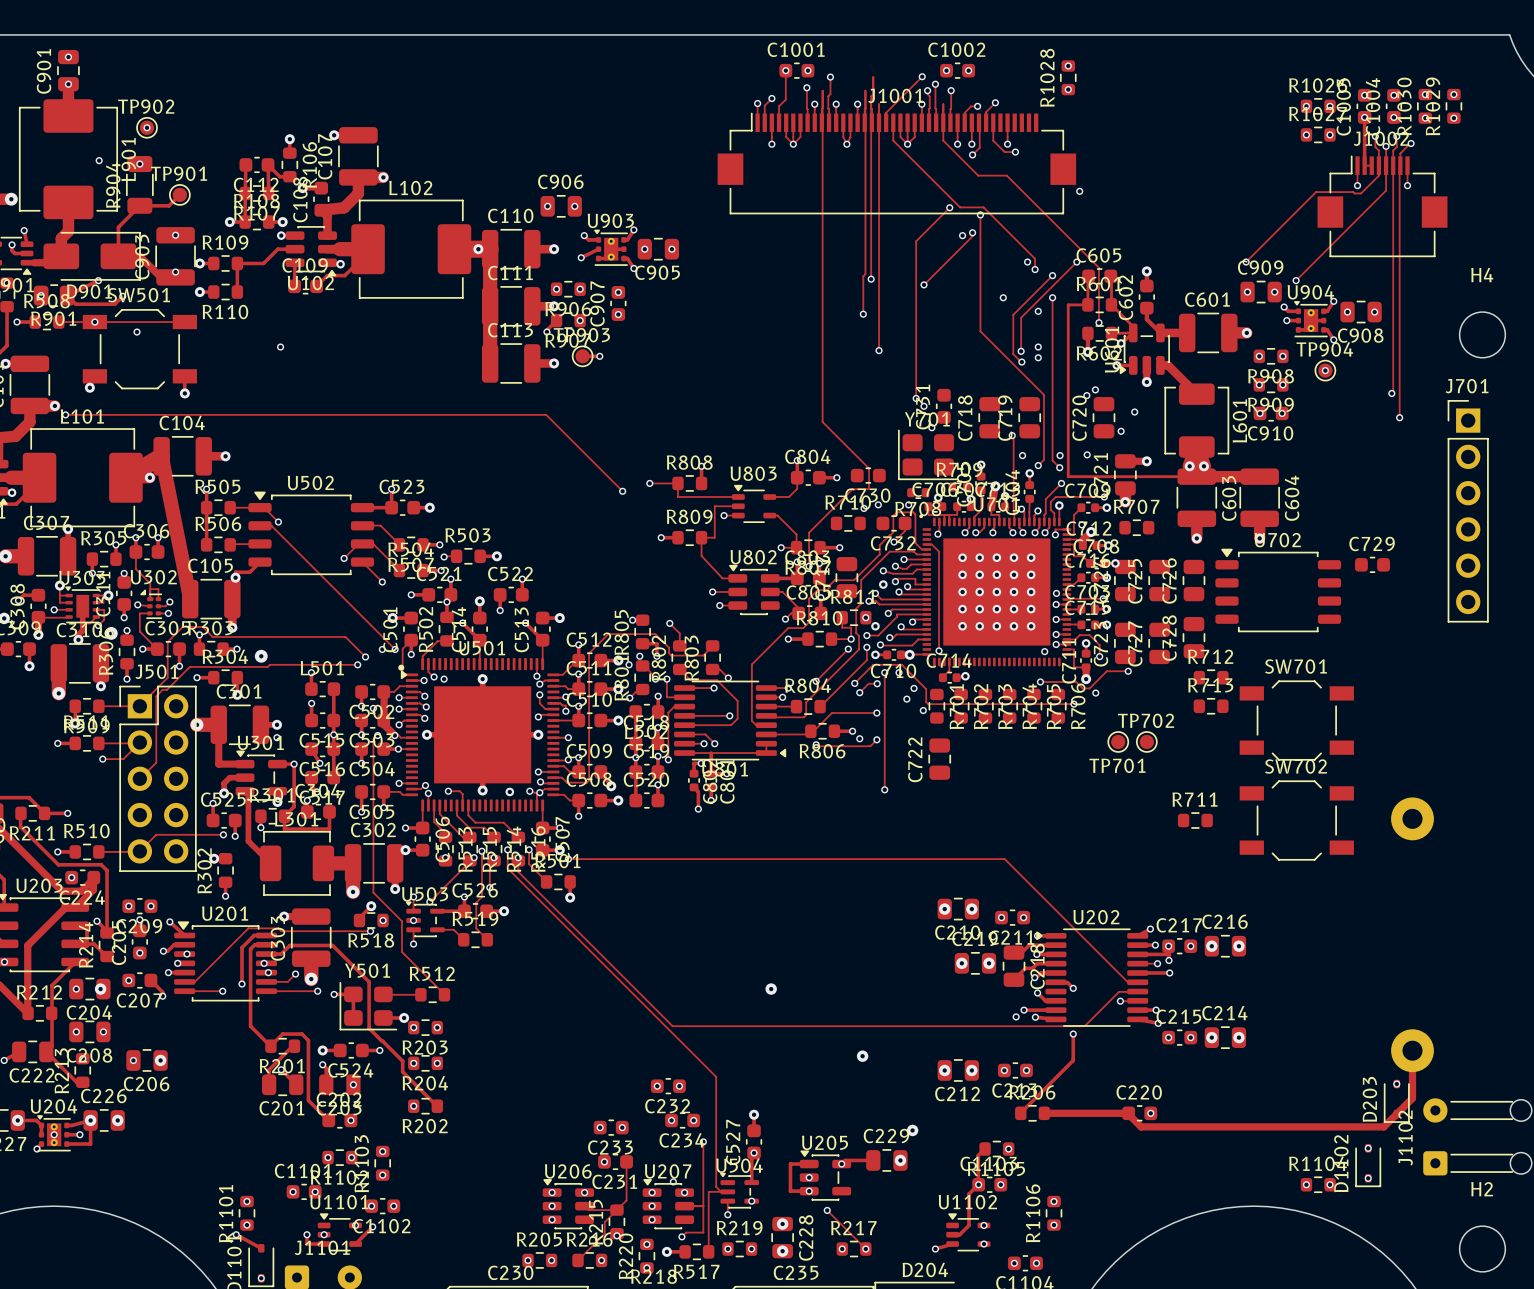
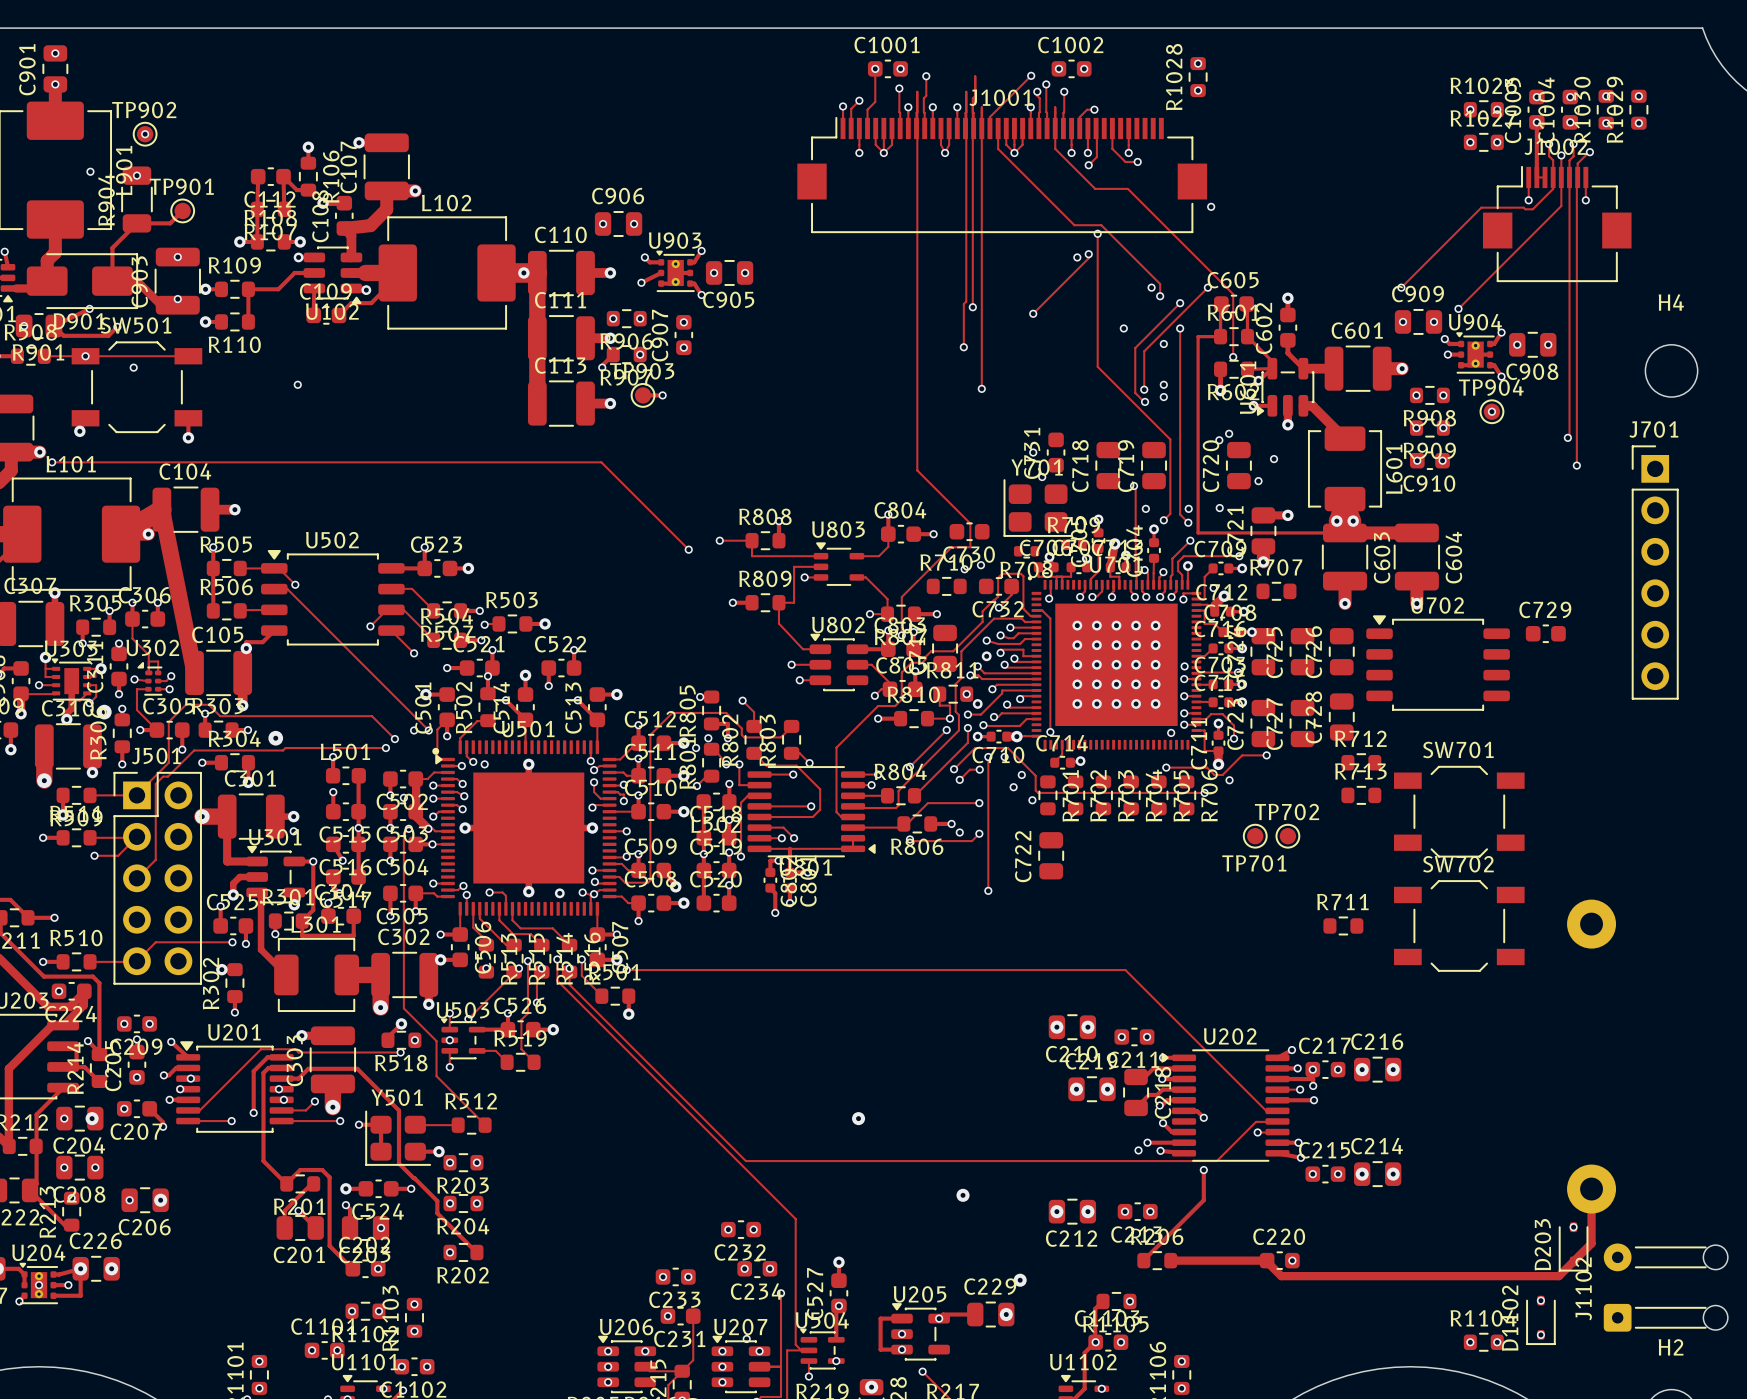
track: (995, 102) (986, 112) (986, 122) -> none
via: (995, 102) -> none
track: (949, 207) (916, 241) (916, 398) -> none
via: (949, 207) -> none
via: (916, 398) -> none
via: (908, 504) -> none

